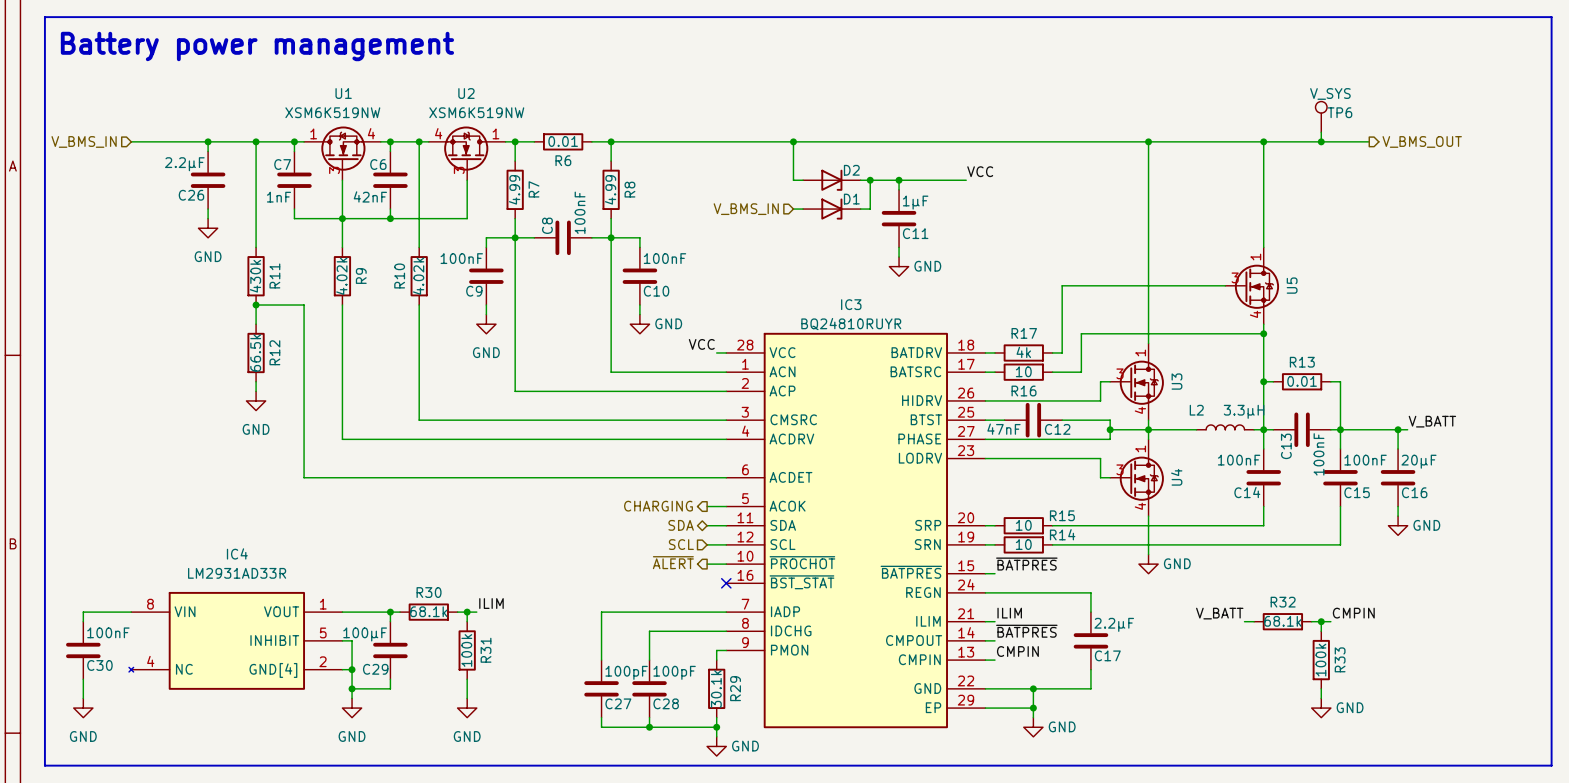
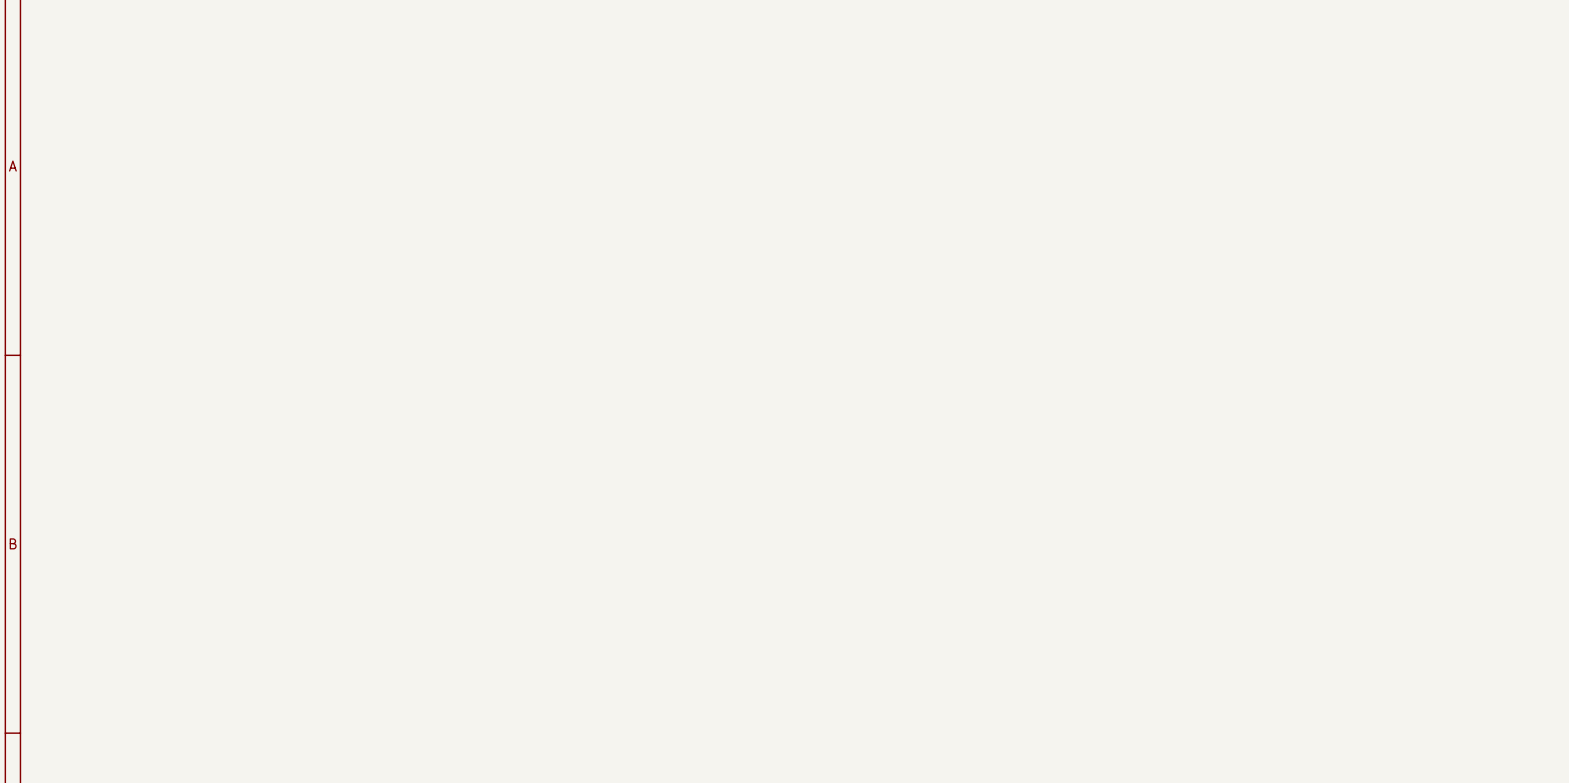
line: (44, 17) (1551, 17) (1551, 765) (44, 765) (44, 17) -> none
text: Battery power management (257, 46) -> none
TP6: V_SYS (1321, 116) -> none
wire: (1321, 132) (1321, 141) -> none
hierarchical label: V_BMS_IN (84, 141) -> none
wire: (131, 141) (304, 141) -> none
wire: (208, 141) (208, 151) -> none
junction: (208, 141) -> none
wire: (256, 141) (256, 247) -> none
junction: (256, 141) -> none
wire: (294, 141) (294, 151) -> none
junction: (294, 141) -> none
wire: (380, 141) (428, 141) -> none
wire: (390, 141) (390, 151) -> none
junction: (390, 141) -> none
wire: (419, 141) (419, 247) -> none
junction: (419, 141) -> none
wire: (505, 141) (534, 141) -> none
wire: (515, 141) (515, 161) -> none
junction: (515, 141) -> none
R6: 0.01 (563, 141) -> none
wire: (591, 141) (1369, 141) -> none
wire: (611, 141) (611, 161) -> none
junction: (611, 141) -> none
wire: (793, 141) (793, 180) (803, 180) -> none
junction: (793, 141) -> none
wire: (1148, 141) (1148, 343) -> none
junction: (1148, 141) -> none
wire: (1263, 141) (1263, 247) -> none
junction: (1263, 141) -> none
junction: (1321, 141) -> none
hierarchical label: V_BMS_OUT (1422, 141) -> none
U1: XSM6K519NW (342, 153) -> none
U2: XSM6K519NW (467, 153) -> none
label: VCC (980, 171) -> none
C26: 2.2µF (208, 180) -> none
C7: 1nF (294, 180) -> none
wire: (342, 180) (342, 247) -> none
C6: 42nF (390, 180) -> none
wire: (467, 180) (467, 218) (294, 218) (294, 209) -> none
D2: (831, 180) -> none
wire: (860, 180) (966, 180) -> none
wire: (870, 180) (870, 209) (860, 209) -> none
junction: (870, 180) -> none
wire: (899, 180) (899, 189) -> none
junction: (899, 180) -> none
R7: 4.99 (515, 189) -> none
R8: 4.99 (611, 189) -> none
wire: (208, 209) (208, 218) -> none
wire: (390, 209) (390, 218) -> none
hierarchical label: V_BMS_IN (746, 209) -> none
wire: (793, 209) (803, 209) -> none
D1: (831, 209) -> none
junction: (342, 218) -> none
junction: (390, 218) -> none
wire: (515, 218) (515, 391) (726, 391) -> none
wire: (611, 218) (611, 372) (726, 372) -> none
C11: 1µF (899, 218) -> none
power symbol: GND (208, 228) -> none
junction: (515, 237) -> none
wire: (534, 237) (486, 237) (486, 247) -> none
C8: 100nF (563, 237) -> none
wire: (591, 237) (639, 237) (639, 247) -> none
junction: (611, 237) -> none
wire: (899, 247) (899, 257) -> none
power symbol: GND (899, 266) -> none
R11: 430k (256, 276) -> none
R9: 4.02k (342, 276) -> none
R10: 4.02k (419, 276) -> none
C9: 100nF (486, 276) -> none
C10: 100nF (639, 276) -> none
wire: (1225, 285) (1062, 285) (1062, 352) (1052, 352) -> none
U5: (1252, 285) -> none
junction: (256, 305) -> none
wire: (342, 305) (342, 439) (726, 439) -> none
wire: (419, 305) (419, 420) (726, 420) -> none
wire: (486, 305) (486, 314) -> none
wire: (639, 305) (639, 314) -> none
wire: (256, 324) (256, 305) (304, 305) (304, 477) (726, 477) -> none
power symbol: GND (486, 324) -> none
power symbol: GND (639, 324) -> none
wire: (1263, 324) (1263, 448) -> none
wire: (1263, 333) (1081, 333) (1081, 372) (1052, 372) -> none
junction: (1263, 333) -> none
label: VCC (701, 344) -> none
R12: 66.5k (256, 352) -> none
wire: (716, 352) (726, 352) -> none
wire: (985, 352) (995, 352) -> none
R17: 4k (1023, 352) -> none
wire: (985, 372) (995, 372) -> none
R16: 10 (1023, 372) -> none
wire: (256, 381) (256, 391) -> none
wire: (1110, 381) (1100, 381) (1100, 400) (985, 400) -> none
U3: (1137, 381) -> none
wire: (1263, 381) (1273, 381) -> none
junction: (1263, 381) -> none
R13: 0.01 (1302, 381) -> none
wire: (1330, 381) (1340, 381) (1340, 448) -> none
power symbol: GND (256, 400) -> none
wire: (985, 420) (1004, 420) -> none
C12: 47nF (1033, 420) -> none
wire: (1062, 420) (1110, 420) (1110, 439) (985, 439) -> none
wire: (1148, 420) (1148, 439) -> none
label: V_BATT (1432, 421) -> none
L2: 3.3µH (1225, 427) -> none
wire: (1110, 429) (1196, 429) -> none
junction: (1110, 429) -> none
junction: (1148, 429) -> none
wire: (1254, 429) (1273, 429) -> none
junction: (1263, 429) -> none
C13: 100nF (1302, 429) -> none
wire: (1330, 429) (1407, 429) -> none
junction: (1340, 429) -> none
wire: (1398, 429) (1398, 448) -> none
junction: (1398, 429) -> none
wire: (985, 458) (1100, 458) (1100, 477) (1110, 477) -> none
U4: (1137, 477) -> none
C14: 100nF (1263, 477) -> none
C15: 100nF (1340, 477) -> none
C16: 20µF (1398, 477) -> none
hierarchical label: CHARGING (658, 506) -> none
wire: (707, 506) (726, 506) -> none
wire: (1263, 506) (1263, 525) (1052, 525) -> none
wire: (1340, 506) (1340, 544) (1052, 544) -> none
wire: (1398, 506) (1398, 516) -> none
wire: (1148, 516) (1148, 554) -> none
hierarchical label: SDA (681, 525) -> none
wire: (707, 525) (726, 525) -> none
wire: (985, 525) (995, 525) -> none
R15: 10 (1023, 525) -> none
power symbol: GND (1398, 525) -> none
IC3: BQ24810RUYR (855, 530) -> none
hierarchical label: SCL (681, 544) -> none
wire: (707, 544) (726, 544) -> none
wire: (985, 544) (995, 544) -> none
R14: 10 (1023, 544) -> none
hierarchical label: ~{ALERT} (673, 562) -> none
wire: (707, 564) (726, 564) -> none
label: ~{BATPRES} (1026, 564) -> none
power symbol: GND (1148, 564) -> none
wire: (985, 573) (995, 573) -> none
no-connect mark: (726, 583) -> none
wire: (985, 592) (1090, 592) (1090, 612) -> none
label: ILIM (491, 603) -> none
wire: (131, 612) (83, 612) (83, 621) -> none
wire: (342, 612) (400, 612) -> none
wire: (390, 612) (390, 621) -> none
junction: (390, 612) -> none
R30: 68.1k (428, 612) -> none
wire: (457, 612) (476, 612) -> none
wire: (467, 612) (467, 621) -> none
junction: (467, 612) -> none
wire: (726, 612) (601, 612) (601, 660) -> none
label: ILIM (1009, 613) -> none
label: V_BATT (1219, 613) -> none
label: CMPIN (1353, 613) -> none
wire: (985, 621) (995, 621) -> none
wire: (1244, 621) (1254, 621) -> none
R32: 68.1k (1282, 621) -> none
wire: (1311, 621) (1330, 621) -> none
wire: (1321, 621) (1321, 631) -> none
junction: (1321, 621) -> none
wire: (726, 631) (649, 631) (649, 660) -> none
label: ~{BATPRES} (1026, 631) -> none
IC4: LM2931AD33R (235, 640) -> none
wire: (342, 640) (352, 640) (352, 698) -> none
wire: (985, 640) (995, 640) -> none
C17: 2.2µF (1090, 640) -> none
C30: 100nF (83, 650) -> none
C29: 100µF (390, 650) -> none
R31: 100k (467, 650) -> none
wire: (726, 650) (716, 650) (716, 660) -> none
label: CMPIN (1017, 651) -> none
wire: (985, 660) (995, 660) -> none
R33: 100k (1321, 660) -> none
wire: (342, 669) (352, 669) -> none
junction: (352, 669) -> none
wire: (1090, 669) (1090, 688) (985, 688) -> none
wire: (83, 679) (83, 698) -> none
wire: (390, 679) (390, 688) (352, 688) -> none
wire: (467, 679) (467, 698) -> none
junction: (352, 688) -> none
C27: 100pF (601, 688) -> none
C28: 100pF (649, 688) -> none
R29: 30.1k (716, 688) -> none
wire: (1033, 688) (1033, 717) -> none
junction: (1033, 688) -> none
wire: (1321, 688) (1321, 698) -> none
power symbol: GND (83, 708) -> none
power symbol: GND (352, 708) -> none
power symbol: GND (467, 708) -> none
wire: (985, 708) (1033, 708) -> none
junction: (1033, 708) -> none
power symbol: GND (1321, 708) -> none
wire: (601, 717) (601, 727) (716, 727) -> none
wire: (649, 717) (649, 727) -> none
wire: (716, 717) (716, 736) -> none
junction: (649, 727) -> none
junction: (716, 727) -> none
power symbol: GND (1033, 727) -> none
power symbol: GND (716, 746) -> none

